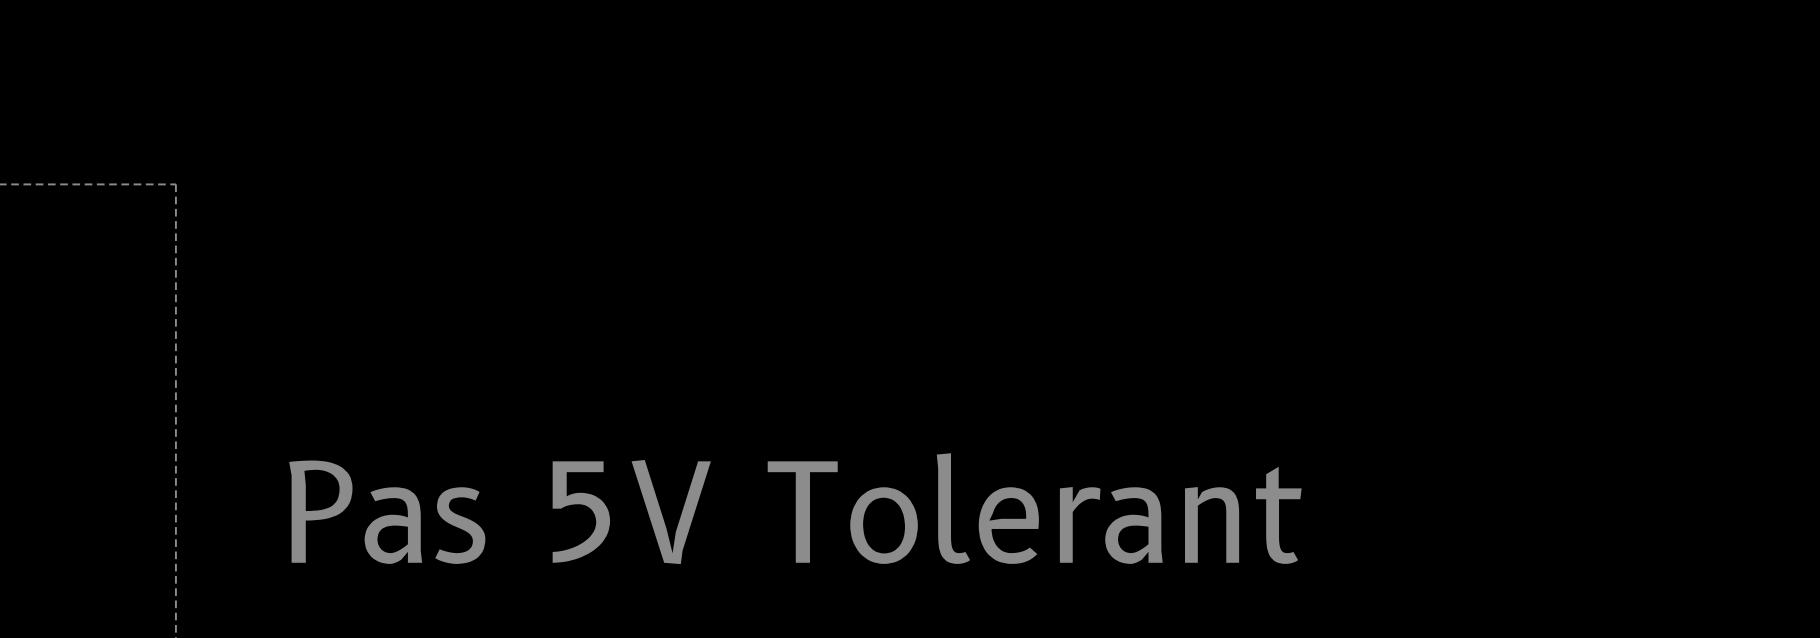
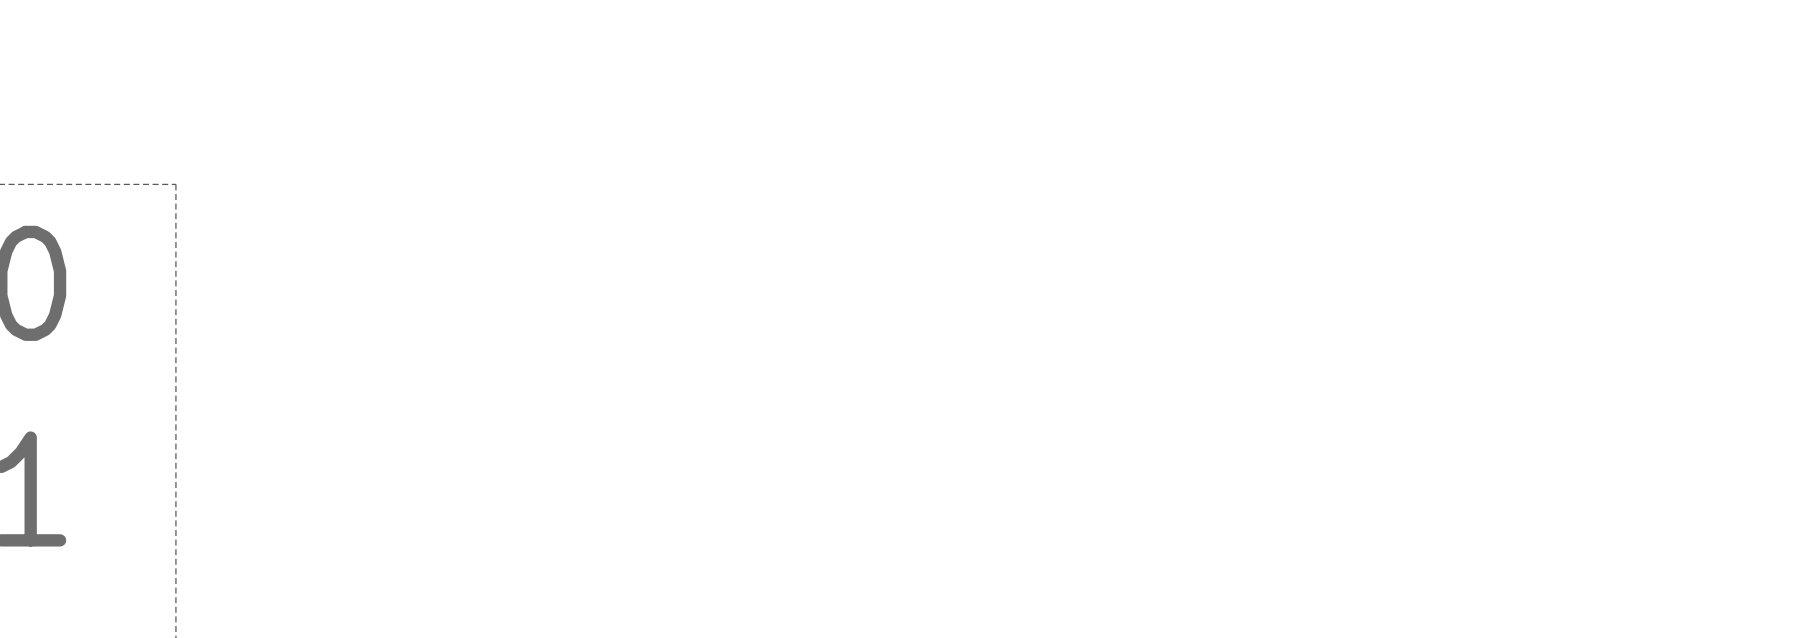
text: Pas 5V Tolerant (795, 508) -> none

